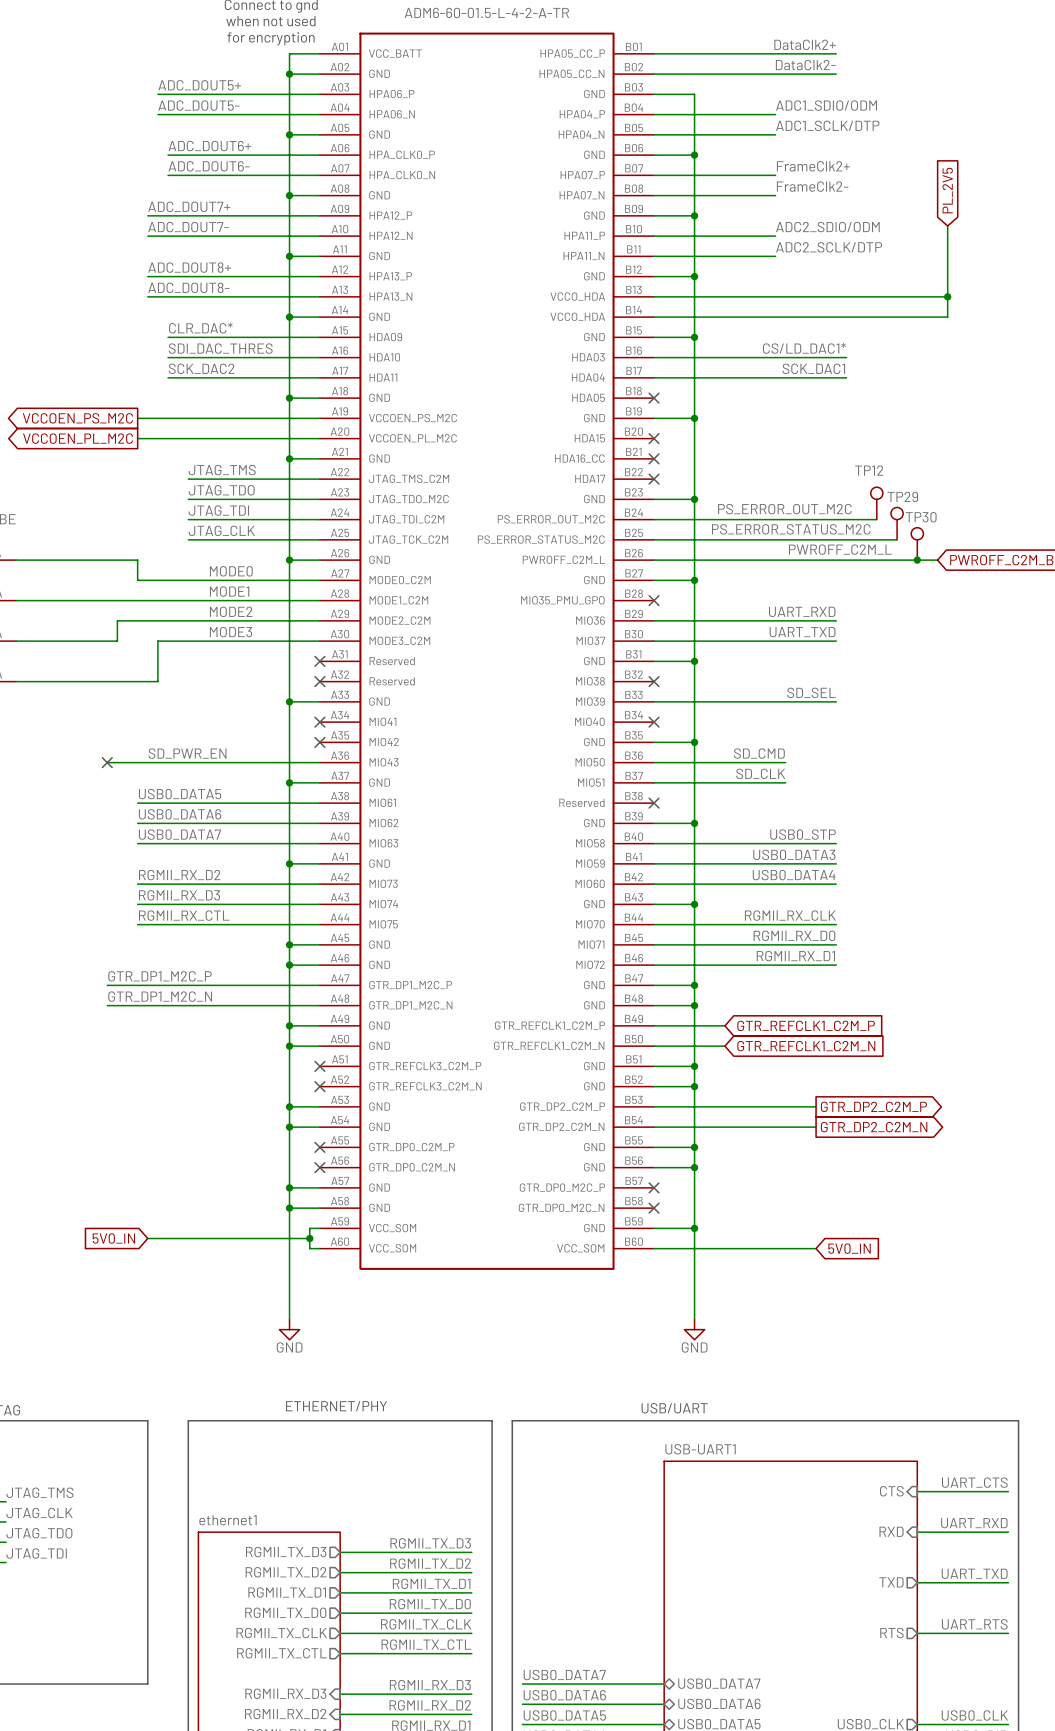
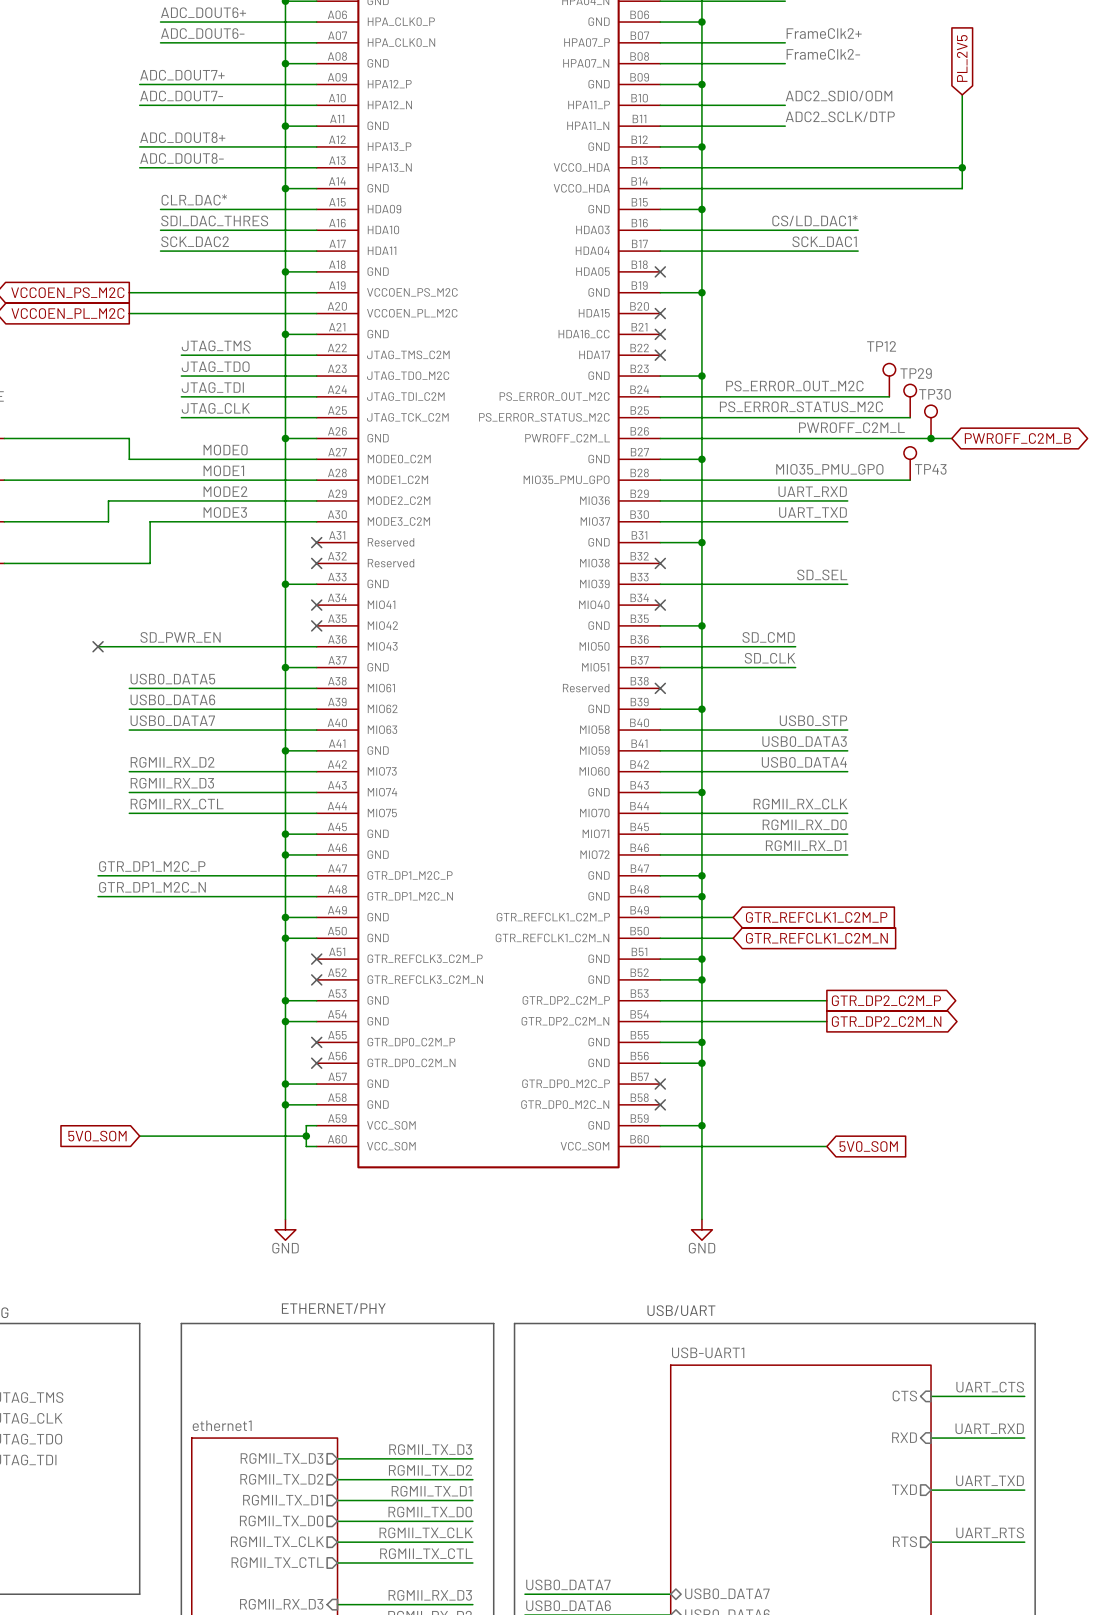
TP43: none -> MIO35_PMU_GPO (910, 463)
wire: none -> (660, 480) (910, 480)
no-connect mark: (654, 600) -> none
global label: 5V0_IN (113, 1238) -> 5V0_SOM (97, 1136)
global label: 5V0_IN (849, 1248) -> 5V0_SOM (868, 1146)

